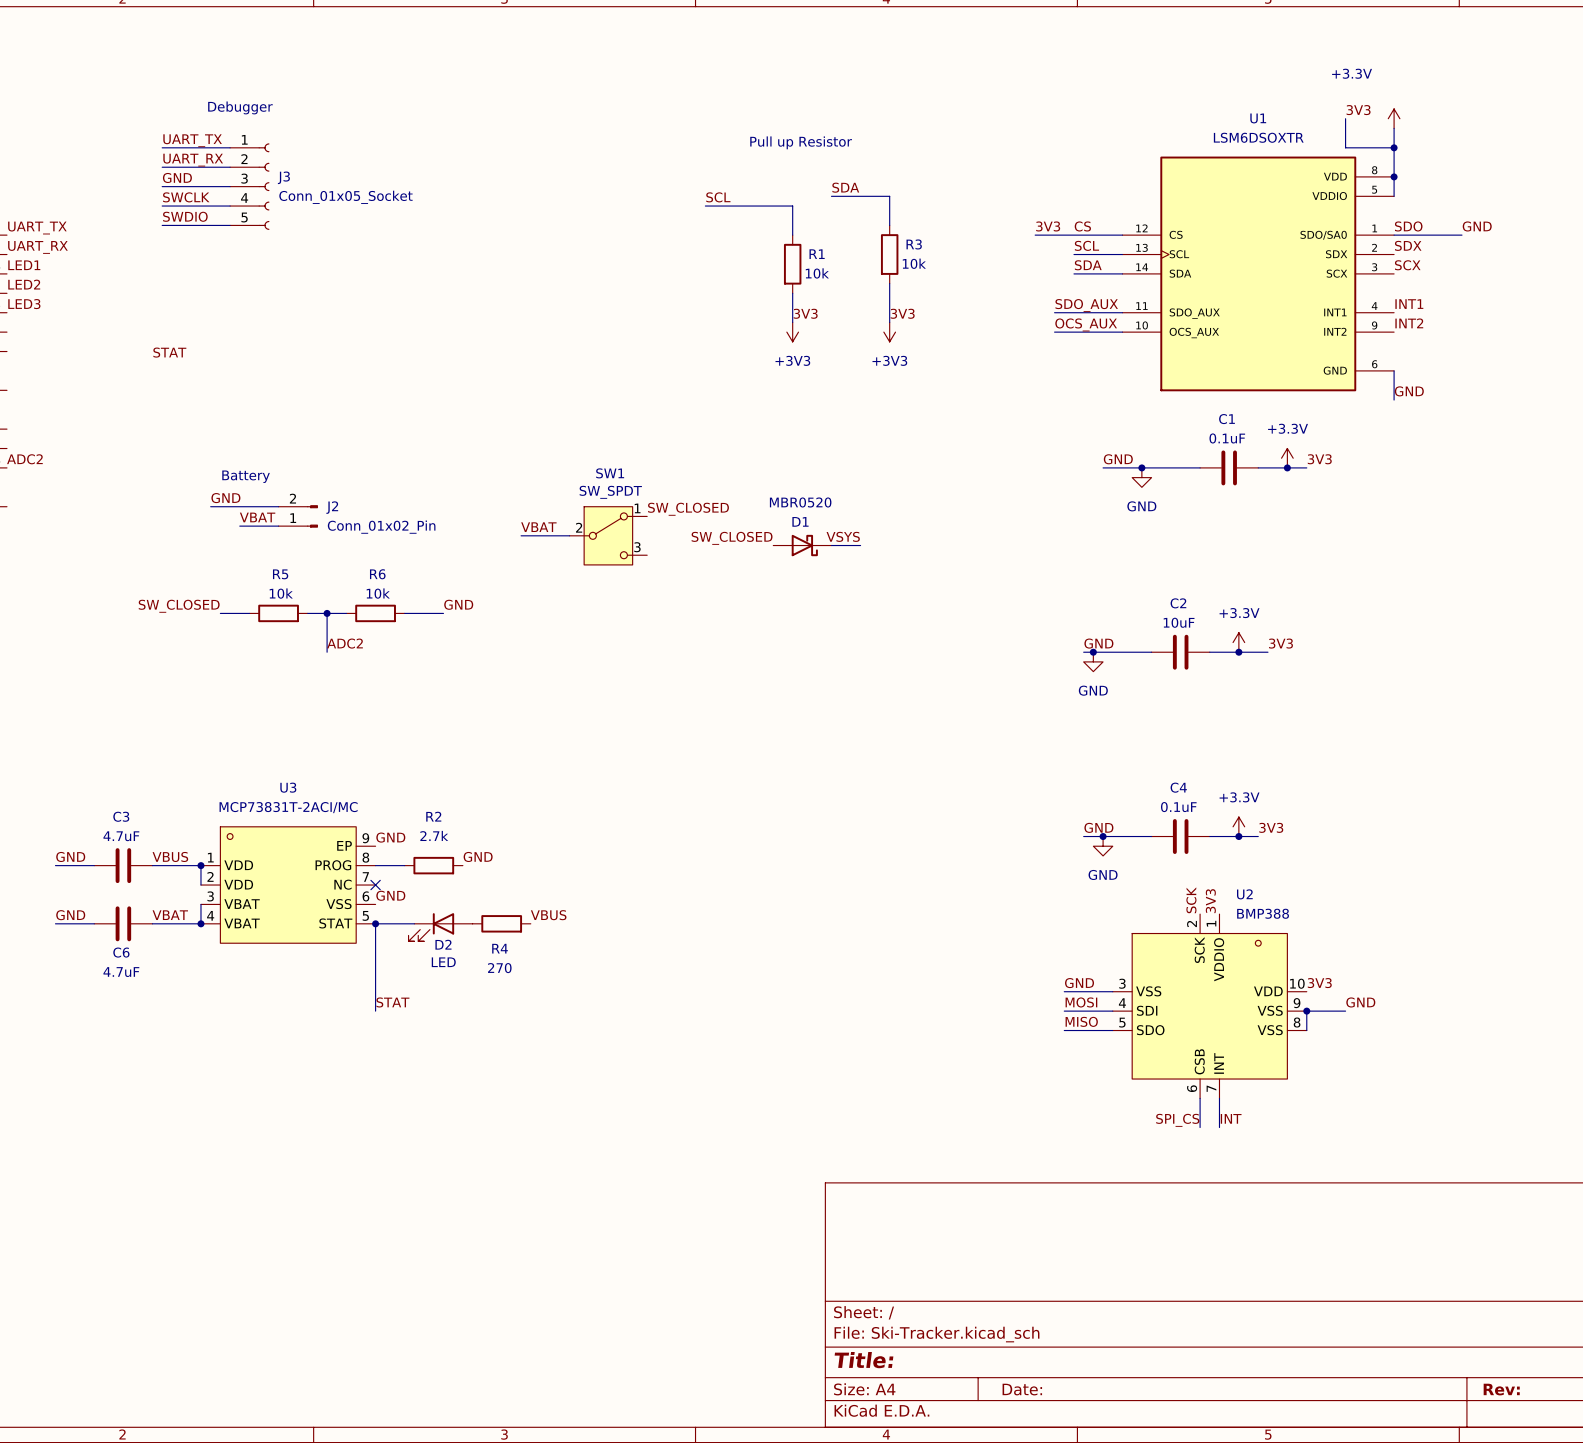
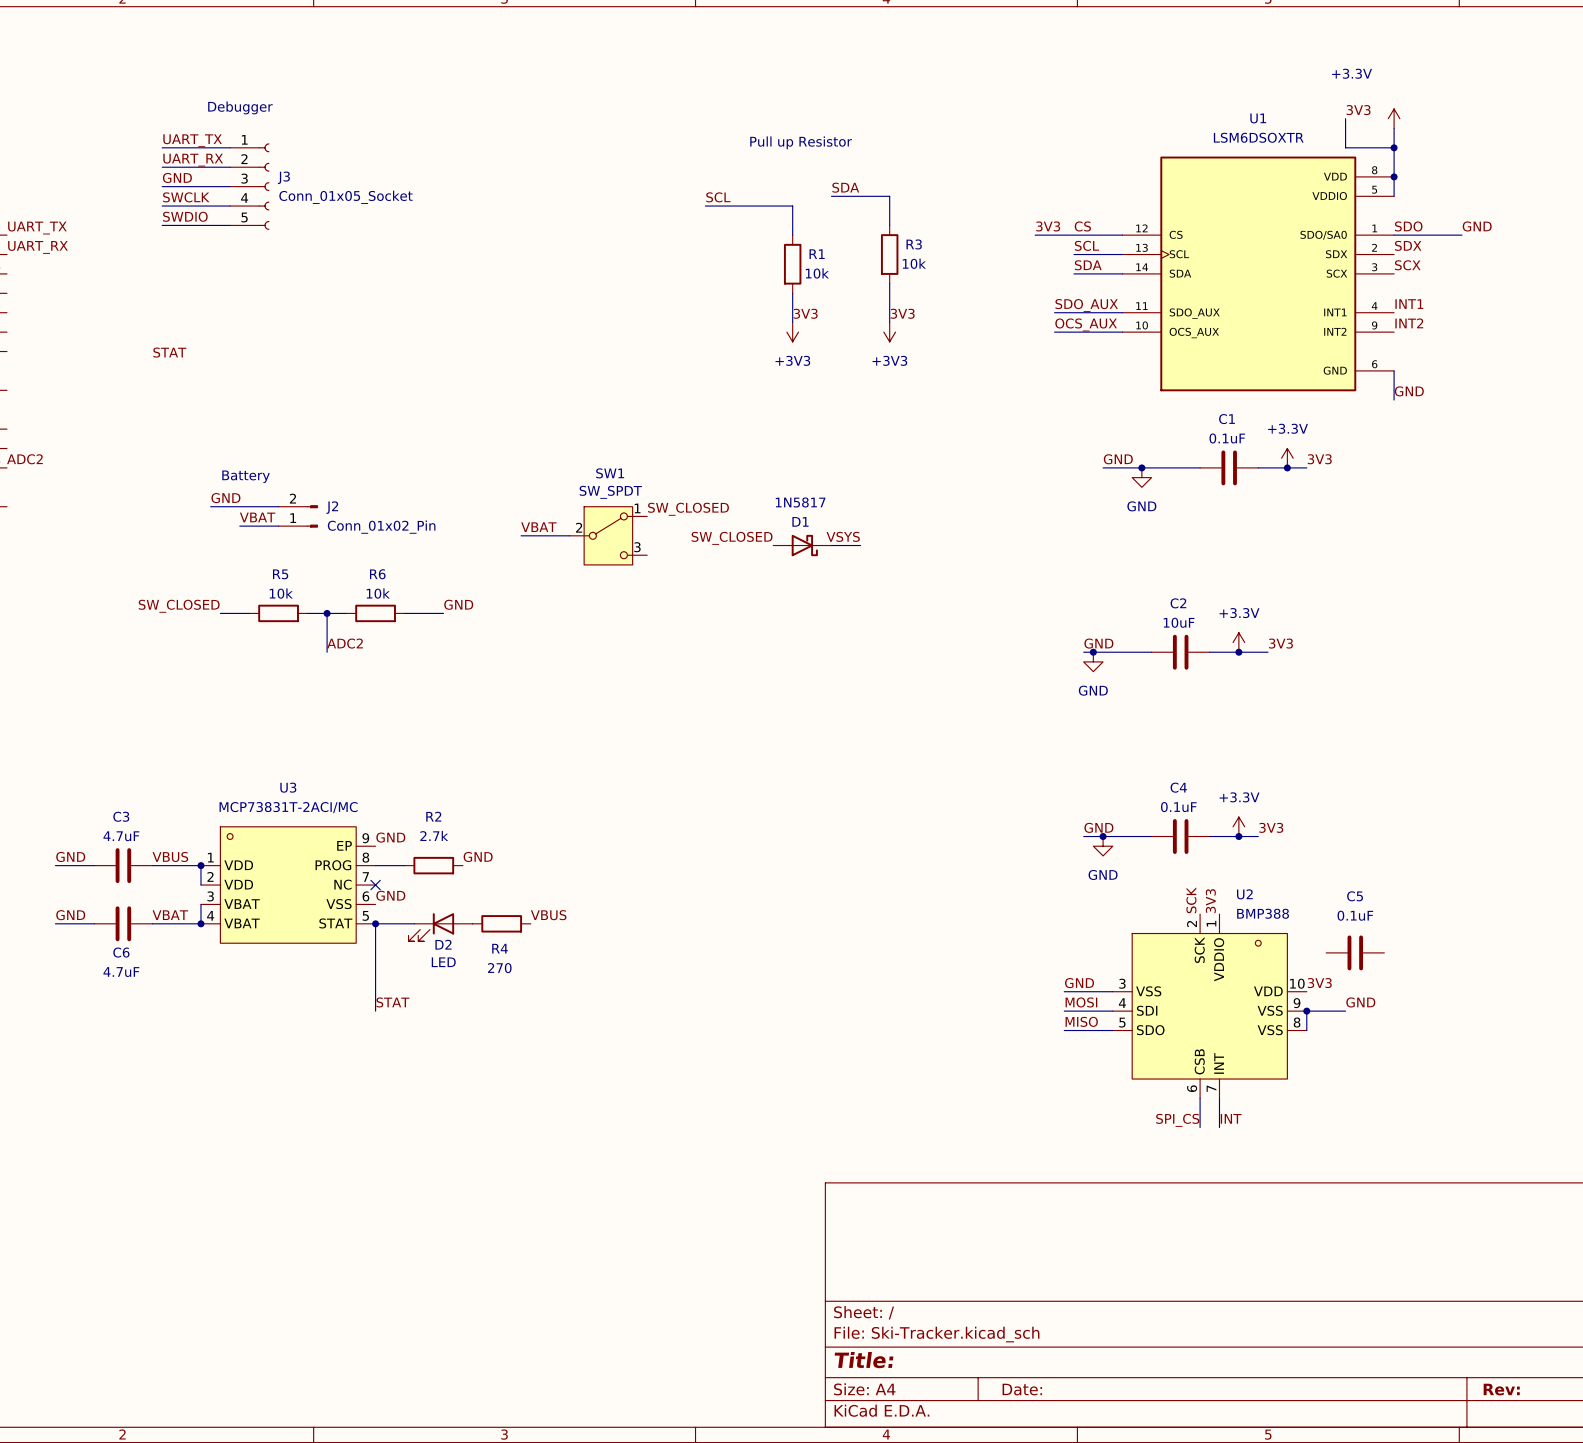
label: LED1 (24, 265) -> none
label: LED2 (24, 284) -> none
label: LED3 (24, 304) -> none
D1 value: MBR0520 (800, 502) -> 1N5817 (800, 502)
C5: none -> 0.1uF (1355, 952)

